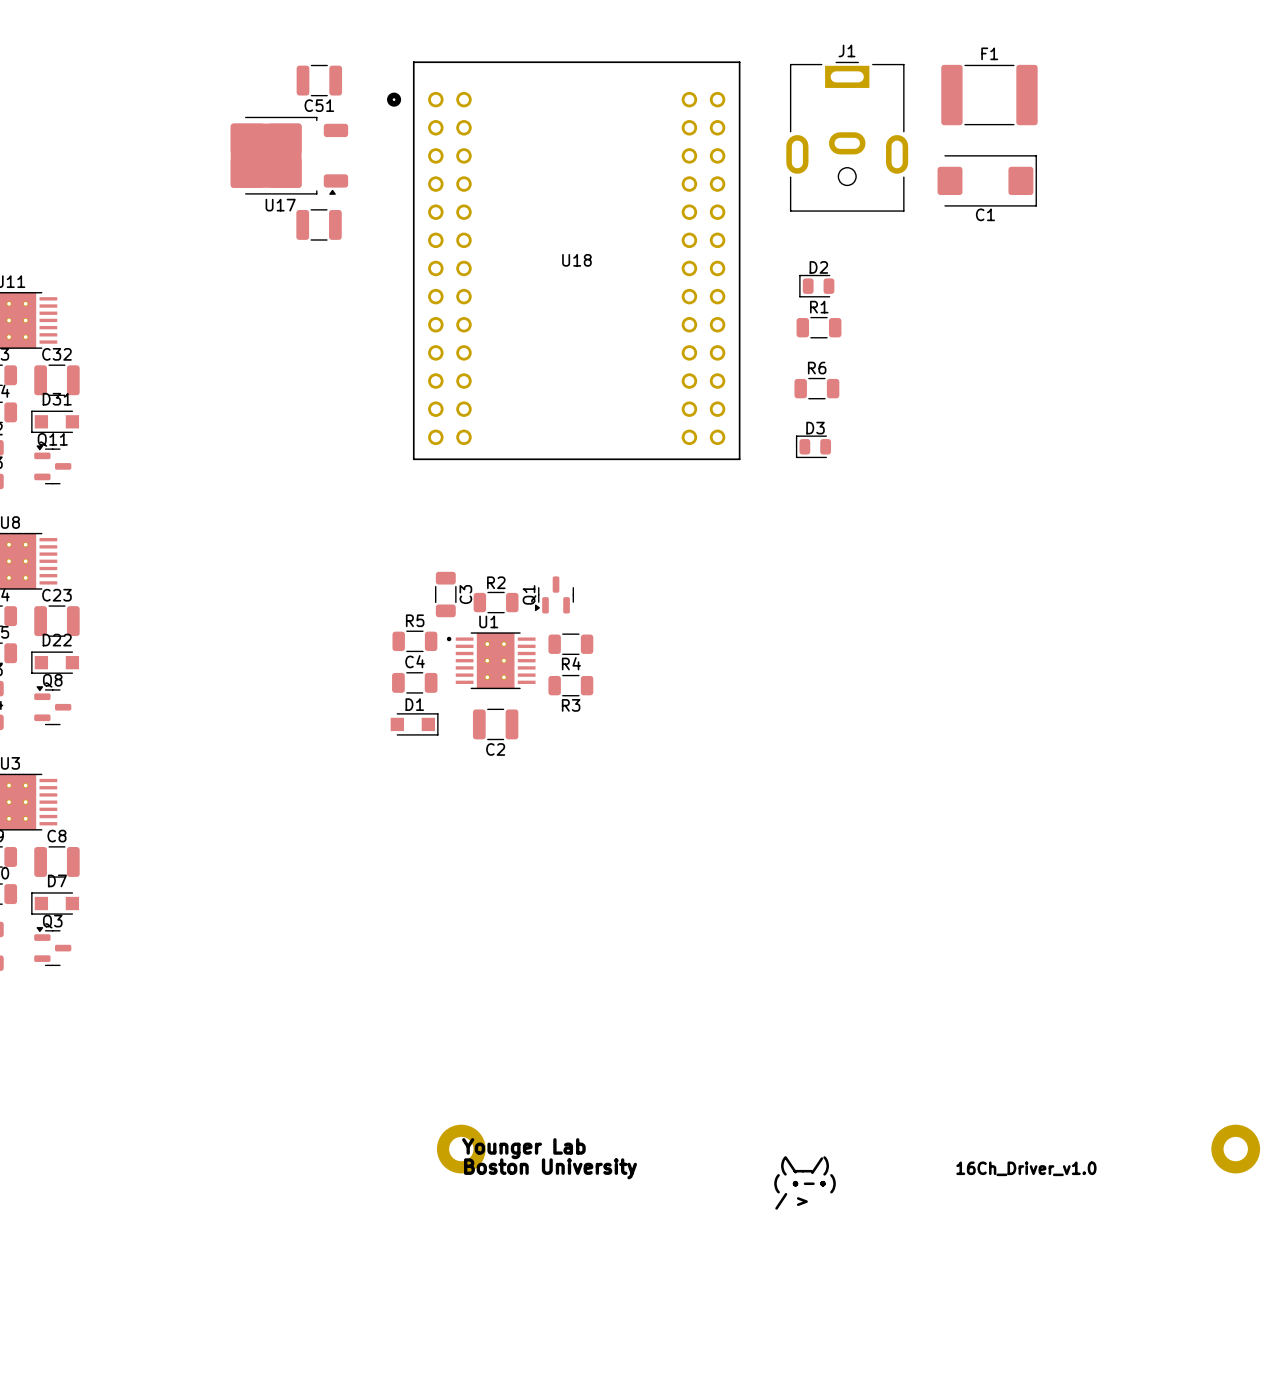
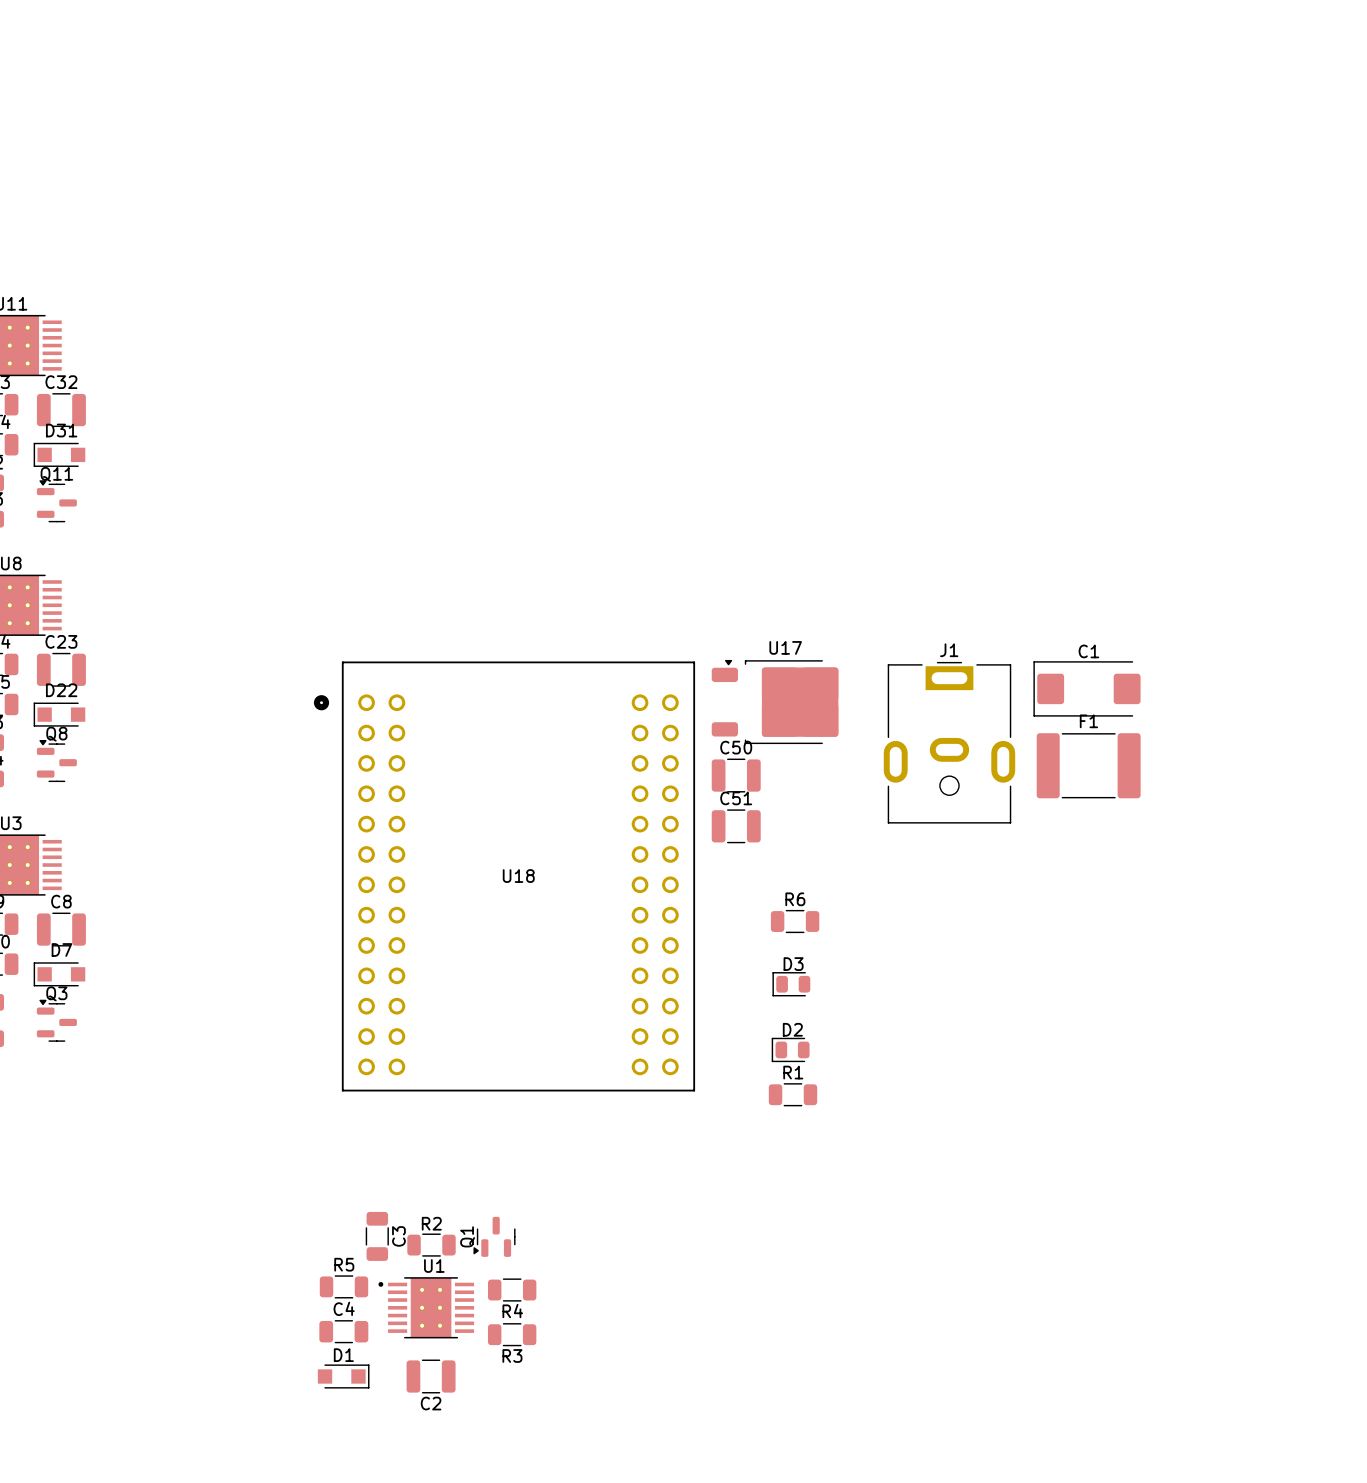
C51 position: (319, 80) -> (736, 826)
F1 position: (989, 95) -> (1088, 765)
C51 name position: C51 (319, 105) -> C51 (736, 798)
J1 position: (847, 136) -> (949, 742)
U17 rotation: 0° (289, 155) -> 180° (775, 702)
U17 position: (289, 155) -> (775, 702)
C1 rotation: 0° (987, 180) -> 180° (1086, 688)
C1 position: (987, 180) -> (1086, 688)
part: (319, 224) -> none
U18 position: (563, 260) -> (504, 876)
D2 position: (816, 286) -> (790, 1049)
R1 position: (818, 327) -> (792, 1094)
R6 position: (816, 388) -> (795, 921)
D3 position: (813, 446) -> (791, 984)
C3 position: (445, 594) -> (377, 1236)
Q1 position: (554, 594) -> (494, 1236)
R2 position: (496, 602) -> (431, 1245)
U1 name position: U1 (488, 621) -> U1 (434, 1265)
R5 position: (414, 641) -> (343, 1286)
R4 position: (570, 644) -> (512, 1290)
U1 position: (491, 660) -> (426, 1307)
C4 position: (414, 682) -> (343, 1331)
R3 position: (570, 685) -> (512, 1334)
C50: none -> (736, 775)
D1 position: (414, 724) -> (343, 1376)
C2 position: (495, 724) -> (431, 1376)
text: Younger Lab (523, 1148) -> none
part: (461, 1149) -> none
part: (1235, 1149) -> none
text: (\__/) (805, 1165) -> none
text: Boston University (550, 1168) -> none
text: 16Ch_Driver_v1.0 (1026, 1168) -> none
text: ( •-•) (805, 1183) -> none
text: / > (791, 1201) -> none

